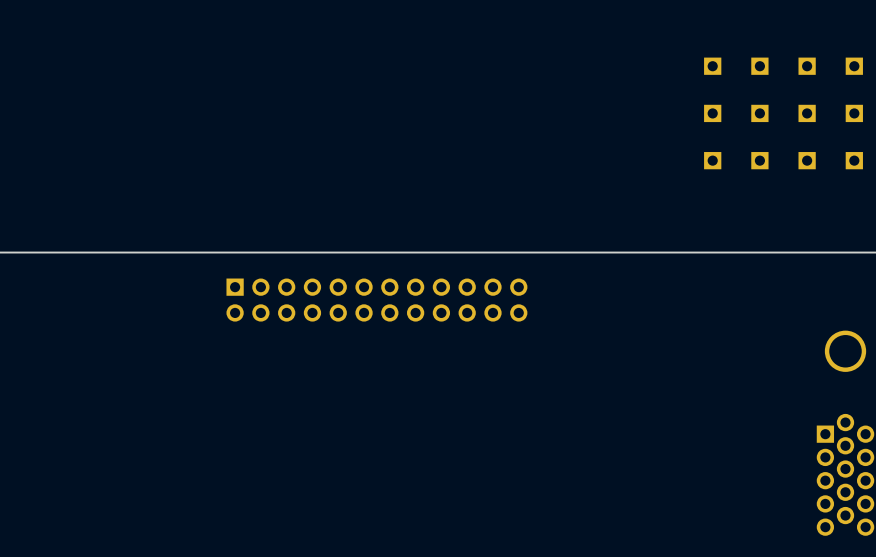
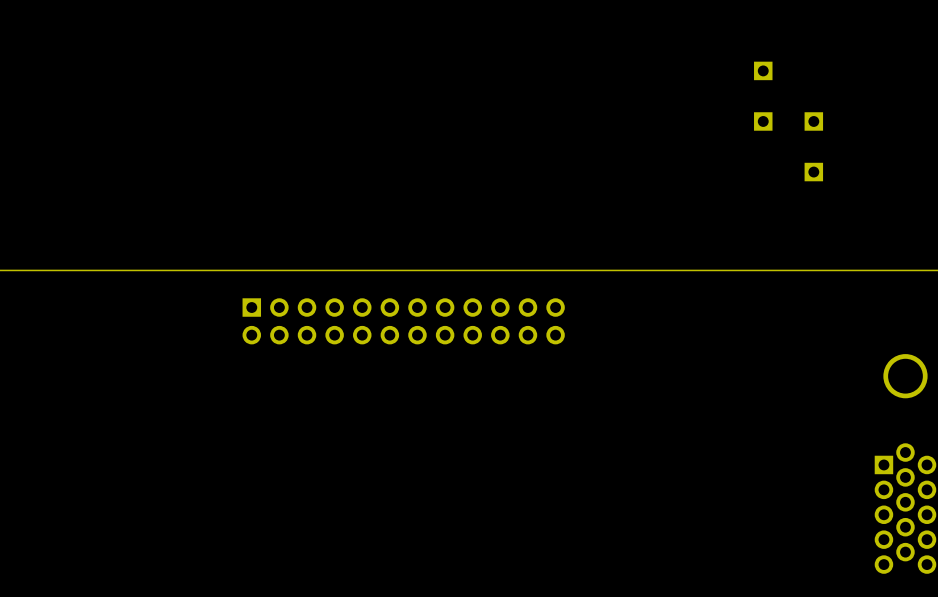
part: (759, 66) -> none
part: (807, 66) -> none
part: (854, 66) -> none
part: (807, 113) -> none
part: (854, 113) -> none
part: (712, 160) -> none
part: (807, 160) -> none
part: (854, 160) -> none

